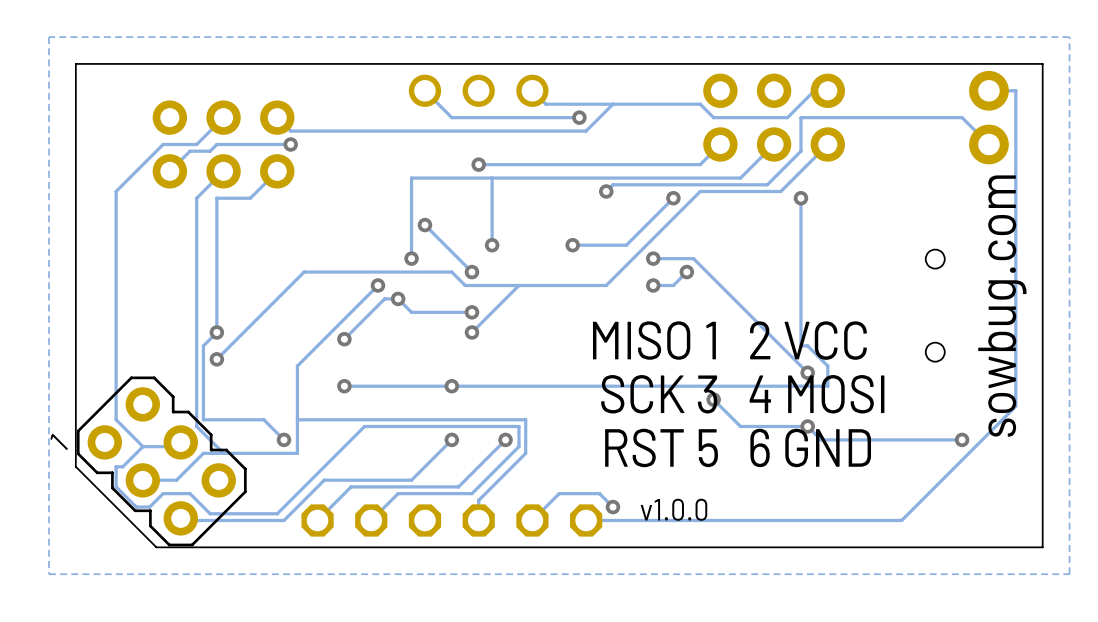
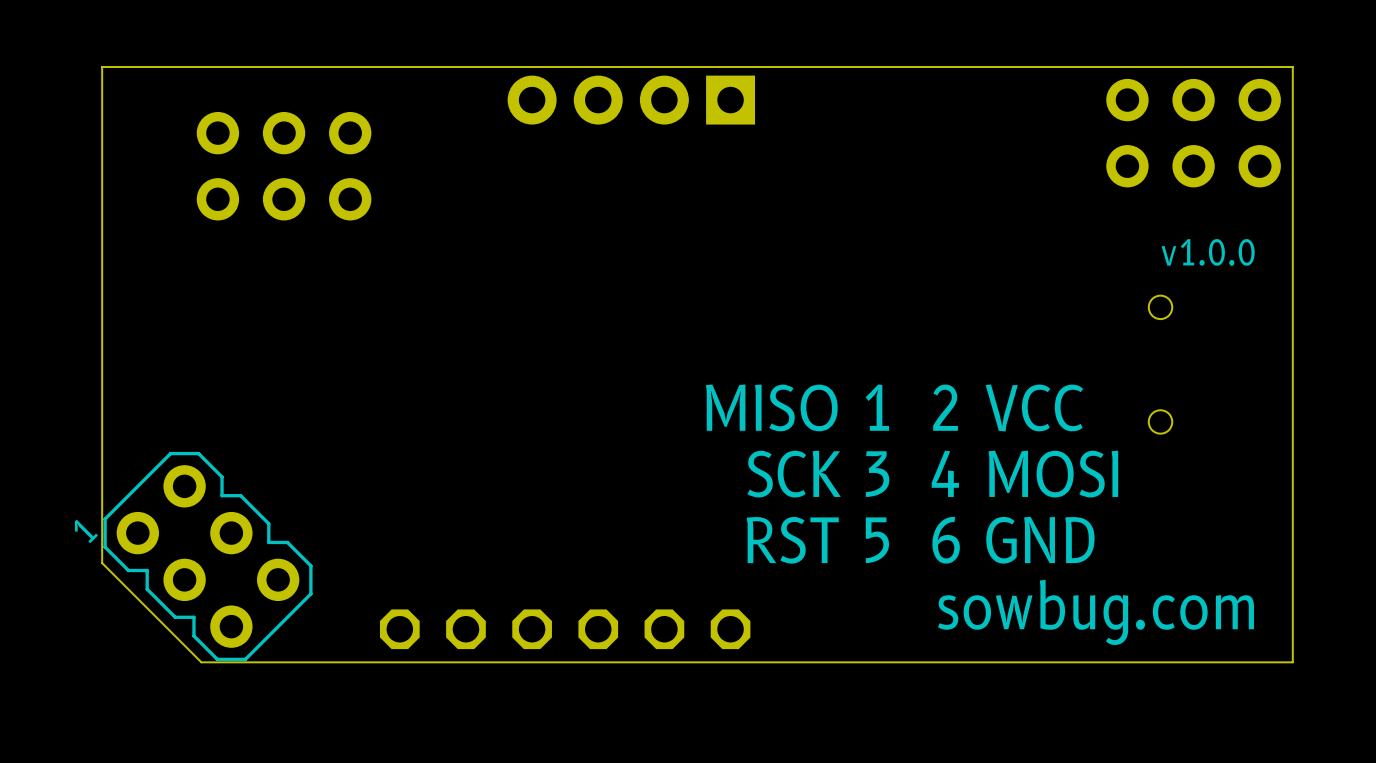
zone outline: (1069, 37) (48, 37) (48, 574) (1069, 574) (1069, 37) -> none
track: (424, 90) (451, 117) (579, 117) -> none
part: (478, 90) -> none
part: none -> (631, 100)
track: (827, 90) (814, 90) (787, 117) (713, 117) (700, 104) (545, 104) (532, 90) -> none
track: (988, 90) (1015, 90) (1015, 406) (901, 520) (586, 520) -> none
track: (612, 104) (586, 131) (290, 131) (277, 117) -> none
track: (223, 117) (196, 144) (163, 144) (116, 191) (116, 419) (142, 446) -> none
via: (579, 117) -> none
part position: (774, 117) -> (1193, 133)
part: (988, 117) -> none
track: (290, 144) (216, 144) (210, 151) (189, 151) (169, 171) -> none
via: (290, 144) -> none
track: (720, 144) (700, 164) (478, 164) -> none
track: (774, 144) (740, 178) (411, 178) (411, 258) -> none
track: (827, 144) (780, 191) (700, 191) (606, 285) (465, 285) (451, 272) (304, 272) (216, 359) -> none
track: (988, 144) (962, 117) (800, 117) (800, 151) (767, 184) (612, 184) (606, 191) -> none
via: (478, 164) -> none
track: (223, 171) (196, 198) (196, 426) (223, 453) -> none
track: (277, 171) (250, 198) (216, 198) (216, 332) (203, 345) (203, 419) (263, 419) (283, 439) -> none
track: (492, 178) (492, 245) -> none
via: (606, 191) -> none
track: (673, 198) (626, 245) (572, 245) -> none
via: (673, 198) -> none
track: (800, 198) (800, 345) (807, 345) (827, 366) (827, 386) (344, 386) -> none
via: (800, 198) -> none
track: (424, 225) (471, 272) -> none
via: (424, 225) -> none
via: (492, 245) -> none
via: (572, 245) -> none
via: (411, 258) -> none
track: (653, 258) (693, 258) (807, 372) -> none
via: (653, 258) -> none
via: (471, 272) -> none
track: (686, 272) (673, 285) (653, 285) -> none
via: (686, 272) -> none
track: (377, 285) (297, 366) (297, 453) (203, 453) (176, 480) (142, 480) -> none
via: (377, 285) -> none
track: (518, 285) (471, 332) -> none
via: (653, 285) -> none
via: (398, 298) -> none
text rotation: 0° (1002, 306) -> 90° clockwise (1095, 612)
track: (471, 312) (411, 312) (398, 298) (384, 298) (344, 339) -> none
via: (471, 312) -> none
via: (216, 332) -> none
via: (471, 332) -> none
via: (344, 339) -> none
via: (216, 359) -> none
via: (807, 372) -> none
via: (344, 386) -> none
via: (451, 386) -> none
track: (713, 399) (740, 426) (807, 426) (821, 439) (962, 439) -> none
via: (713, 399) -> none
track: (297, 419) (525, 419) (525, 453) (478, 500) (478, 520) -> none
via: (807, 426) -> none
via: (283, 439) -> none
track: (451, 439) (411, 480) (324, 480) (283, 520) (183, 520) (180, 518) -> none
via: (451, 439) -> none
track: (505, 439) (458, 486) (351, 486) (317, 520) -> none
via: (505, 439) -> none
via: (962, 439) -> none
track: (180, 442) (176, 446) (142, 446) -> none
track: (142, 446) (122, 466) (116, 466) (116, 486) (136, 507) (149, 507) (163, 493) (189, 493) (210, 513) (277, 513) (364, 426) (518, 426) (518, 446) (471, 493) (398, 493) (371, 520) -> none
track: (612, 507) (599, 493) (559, 493) (532, 520) -> none
via: (612, 507) -> none
text position: v1.0.0 (673, 509) -> v1.0.0 (1208, 252)

